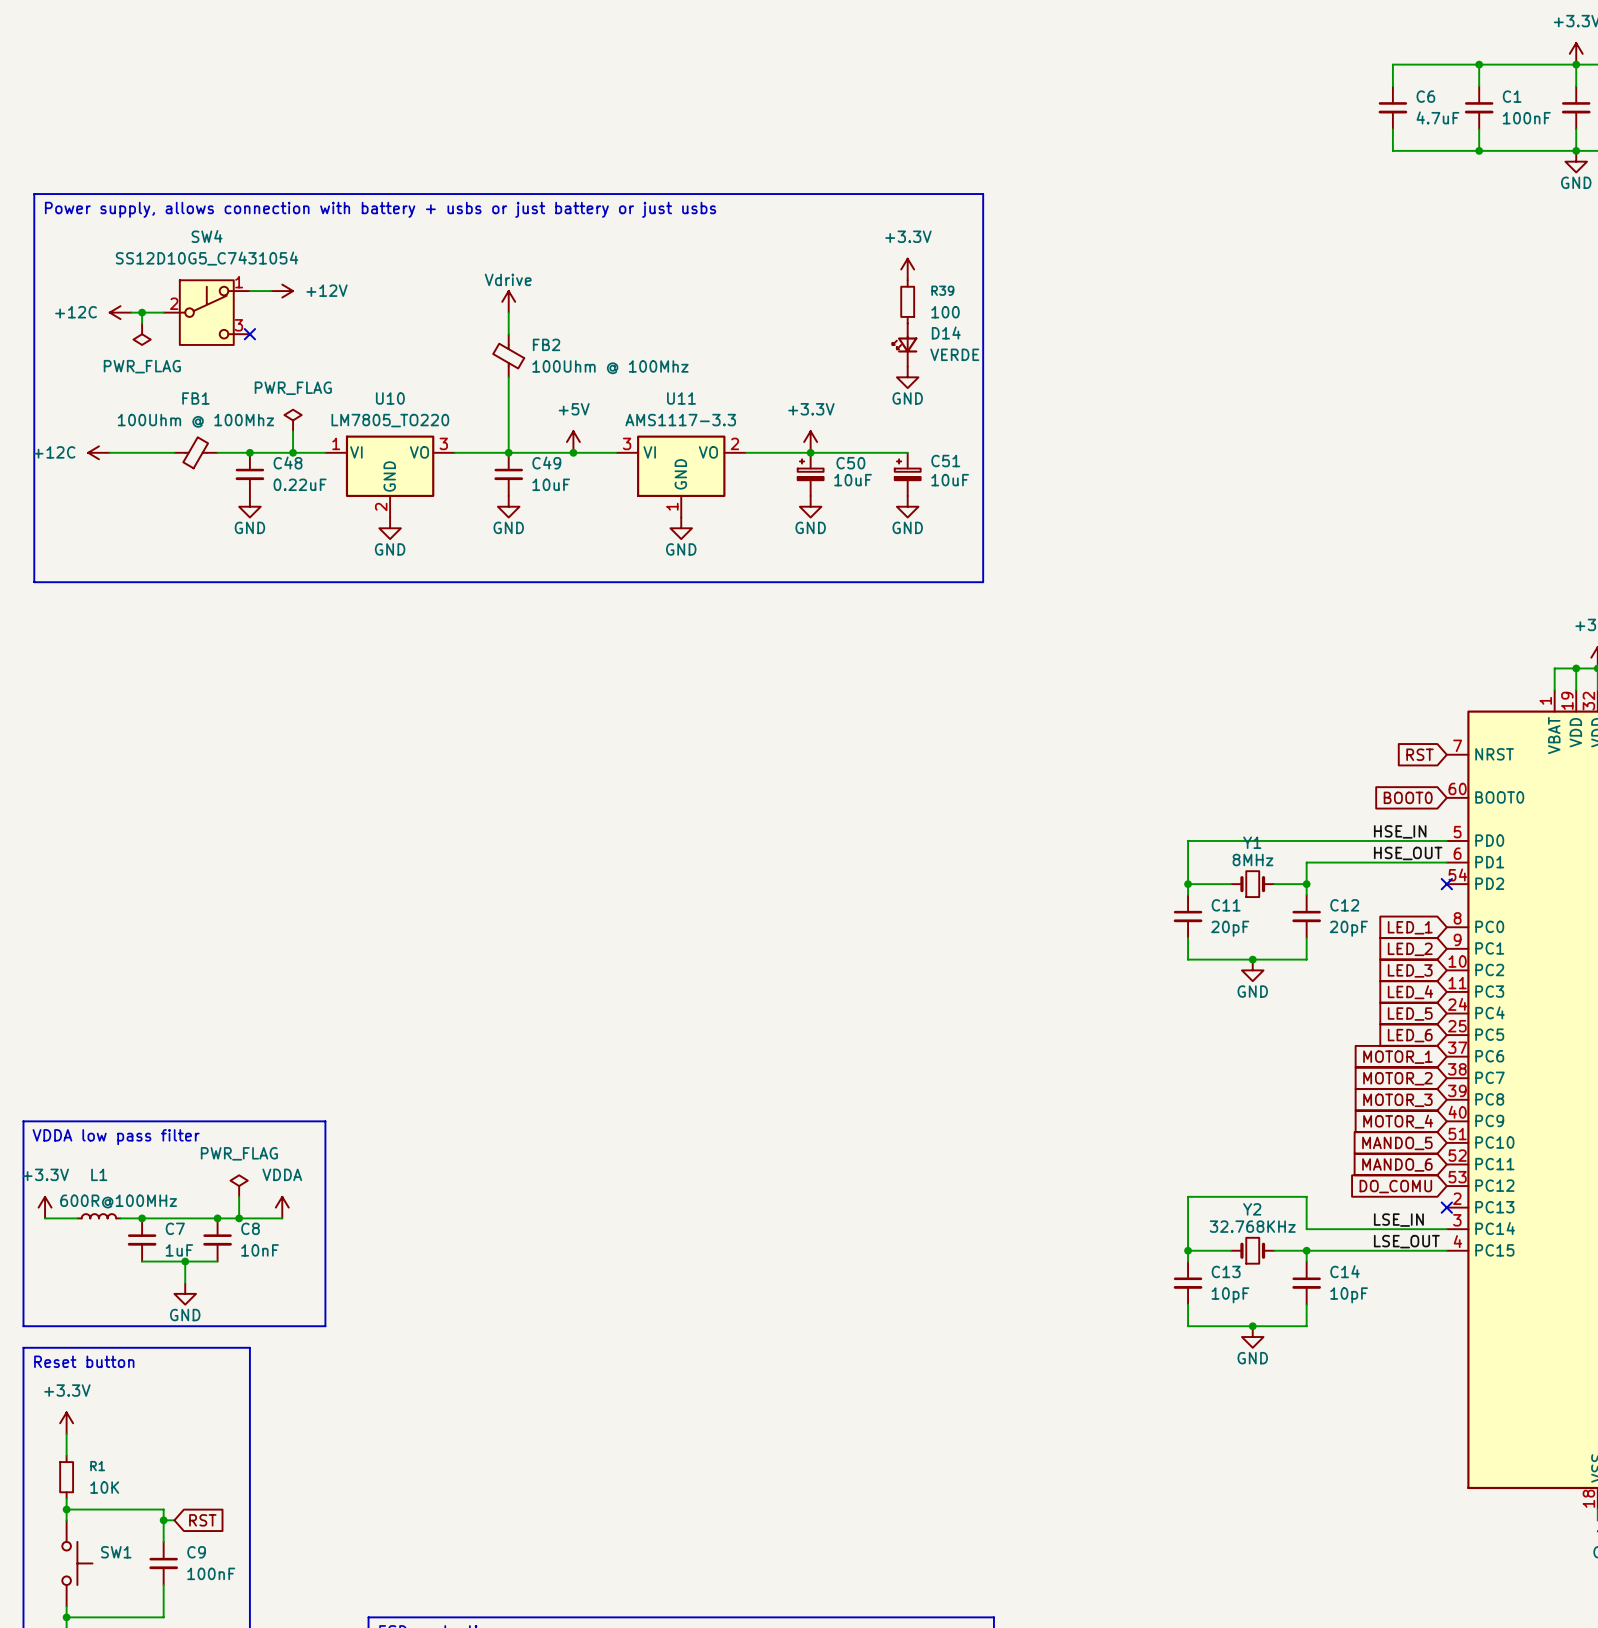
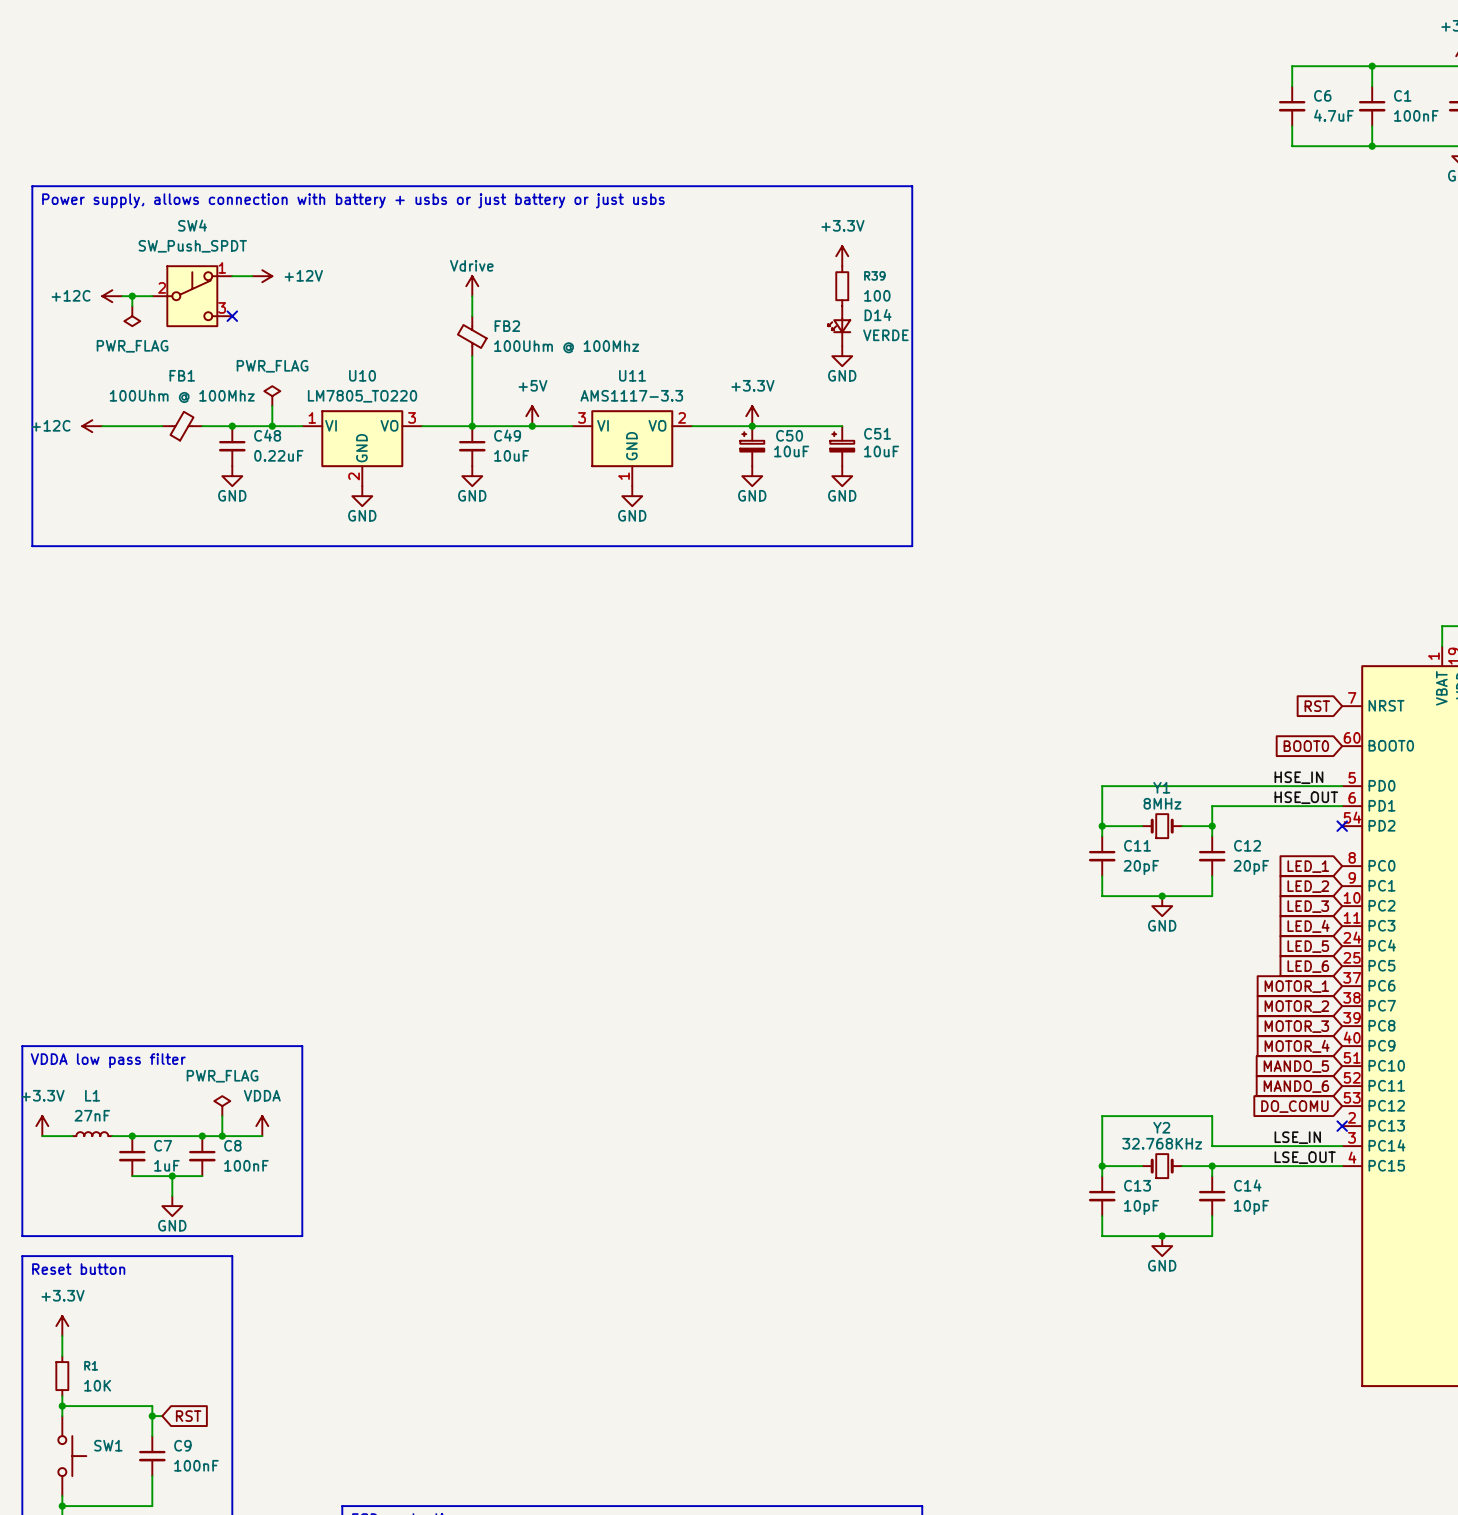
SW4 value: SS12D10G5_C7431054 (207, 258) -> SW_Push_SPDT (192, 246)
L1 value: 600R@100MHz (118, 1201) -> 27nF (92, 1115)
C8 value: 10nF (260, 1250) -> 100nF (246, 1165)

